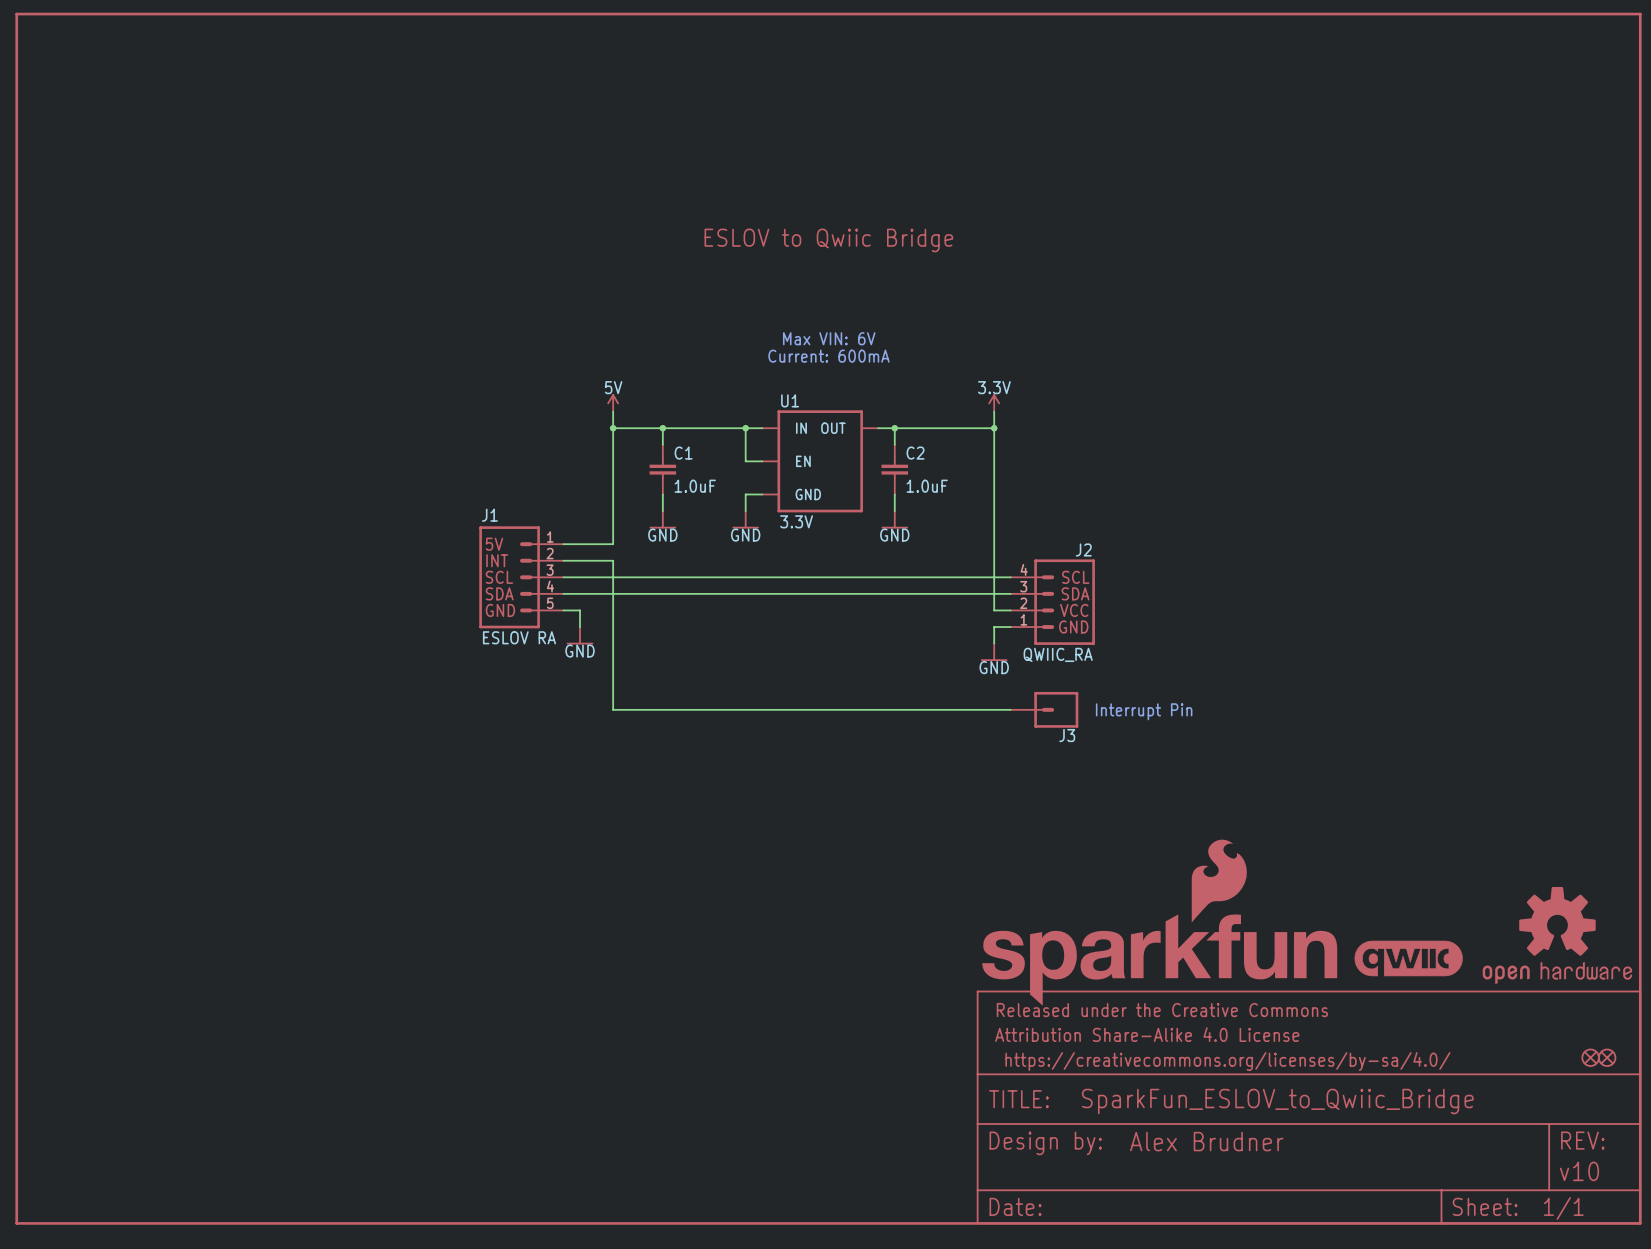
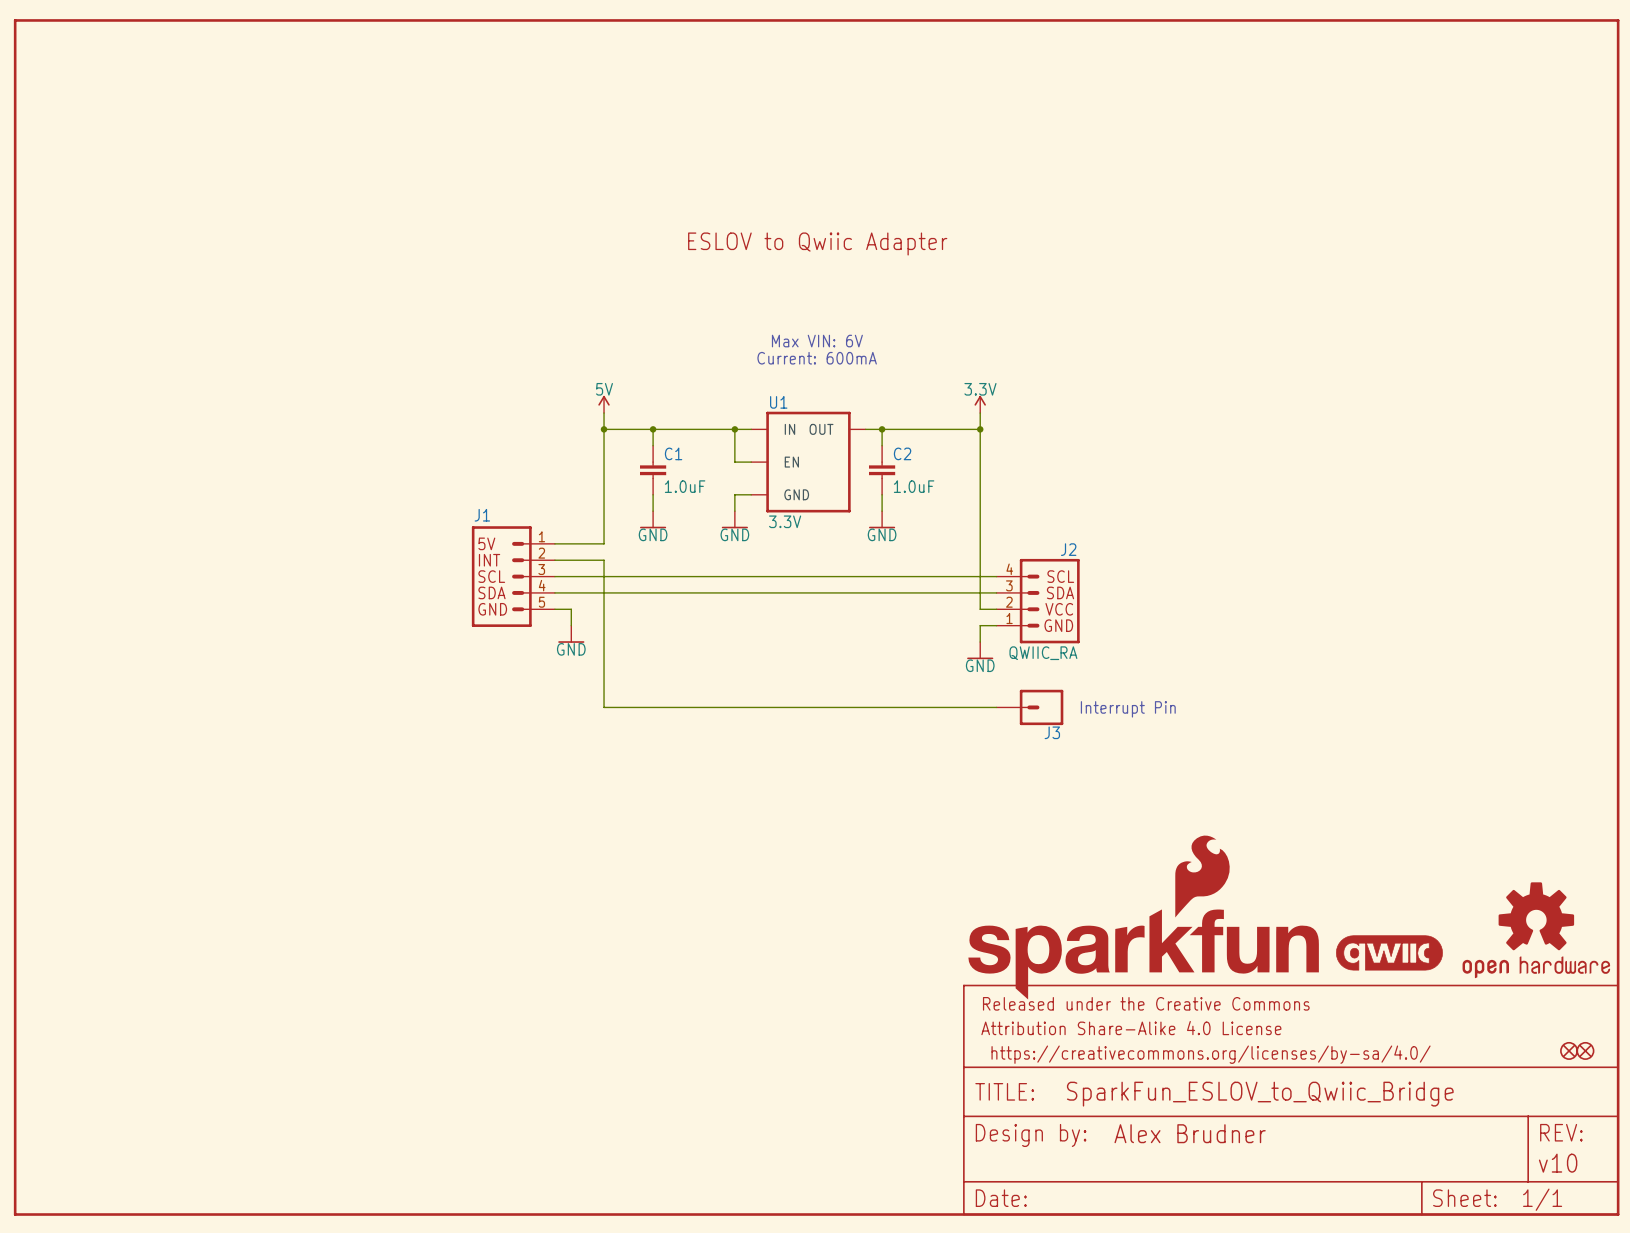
text: ESLOV to Qwiic Bridge (828, 240) -> ESLOV to Qwiic Adapter (817, 244)
J1 value: ESLOV RA (519, 637) -> none

